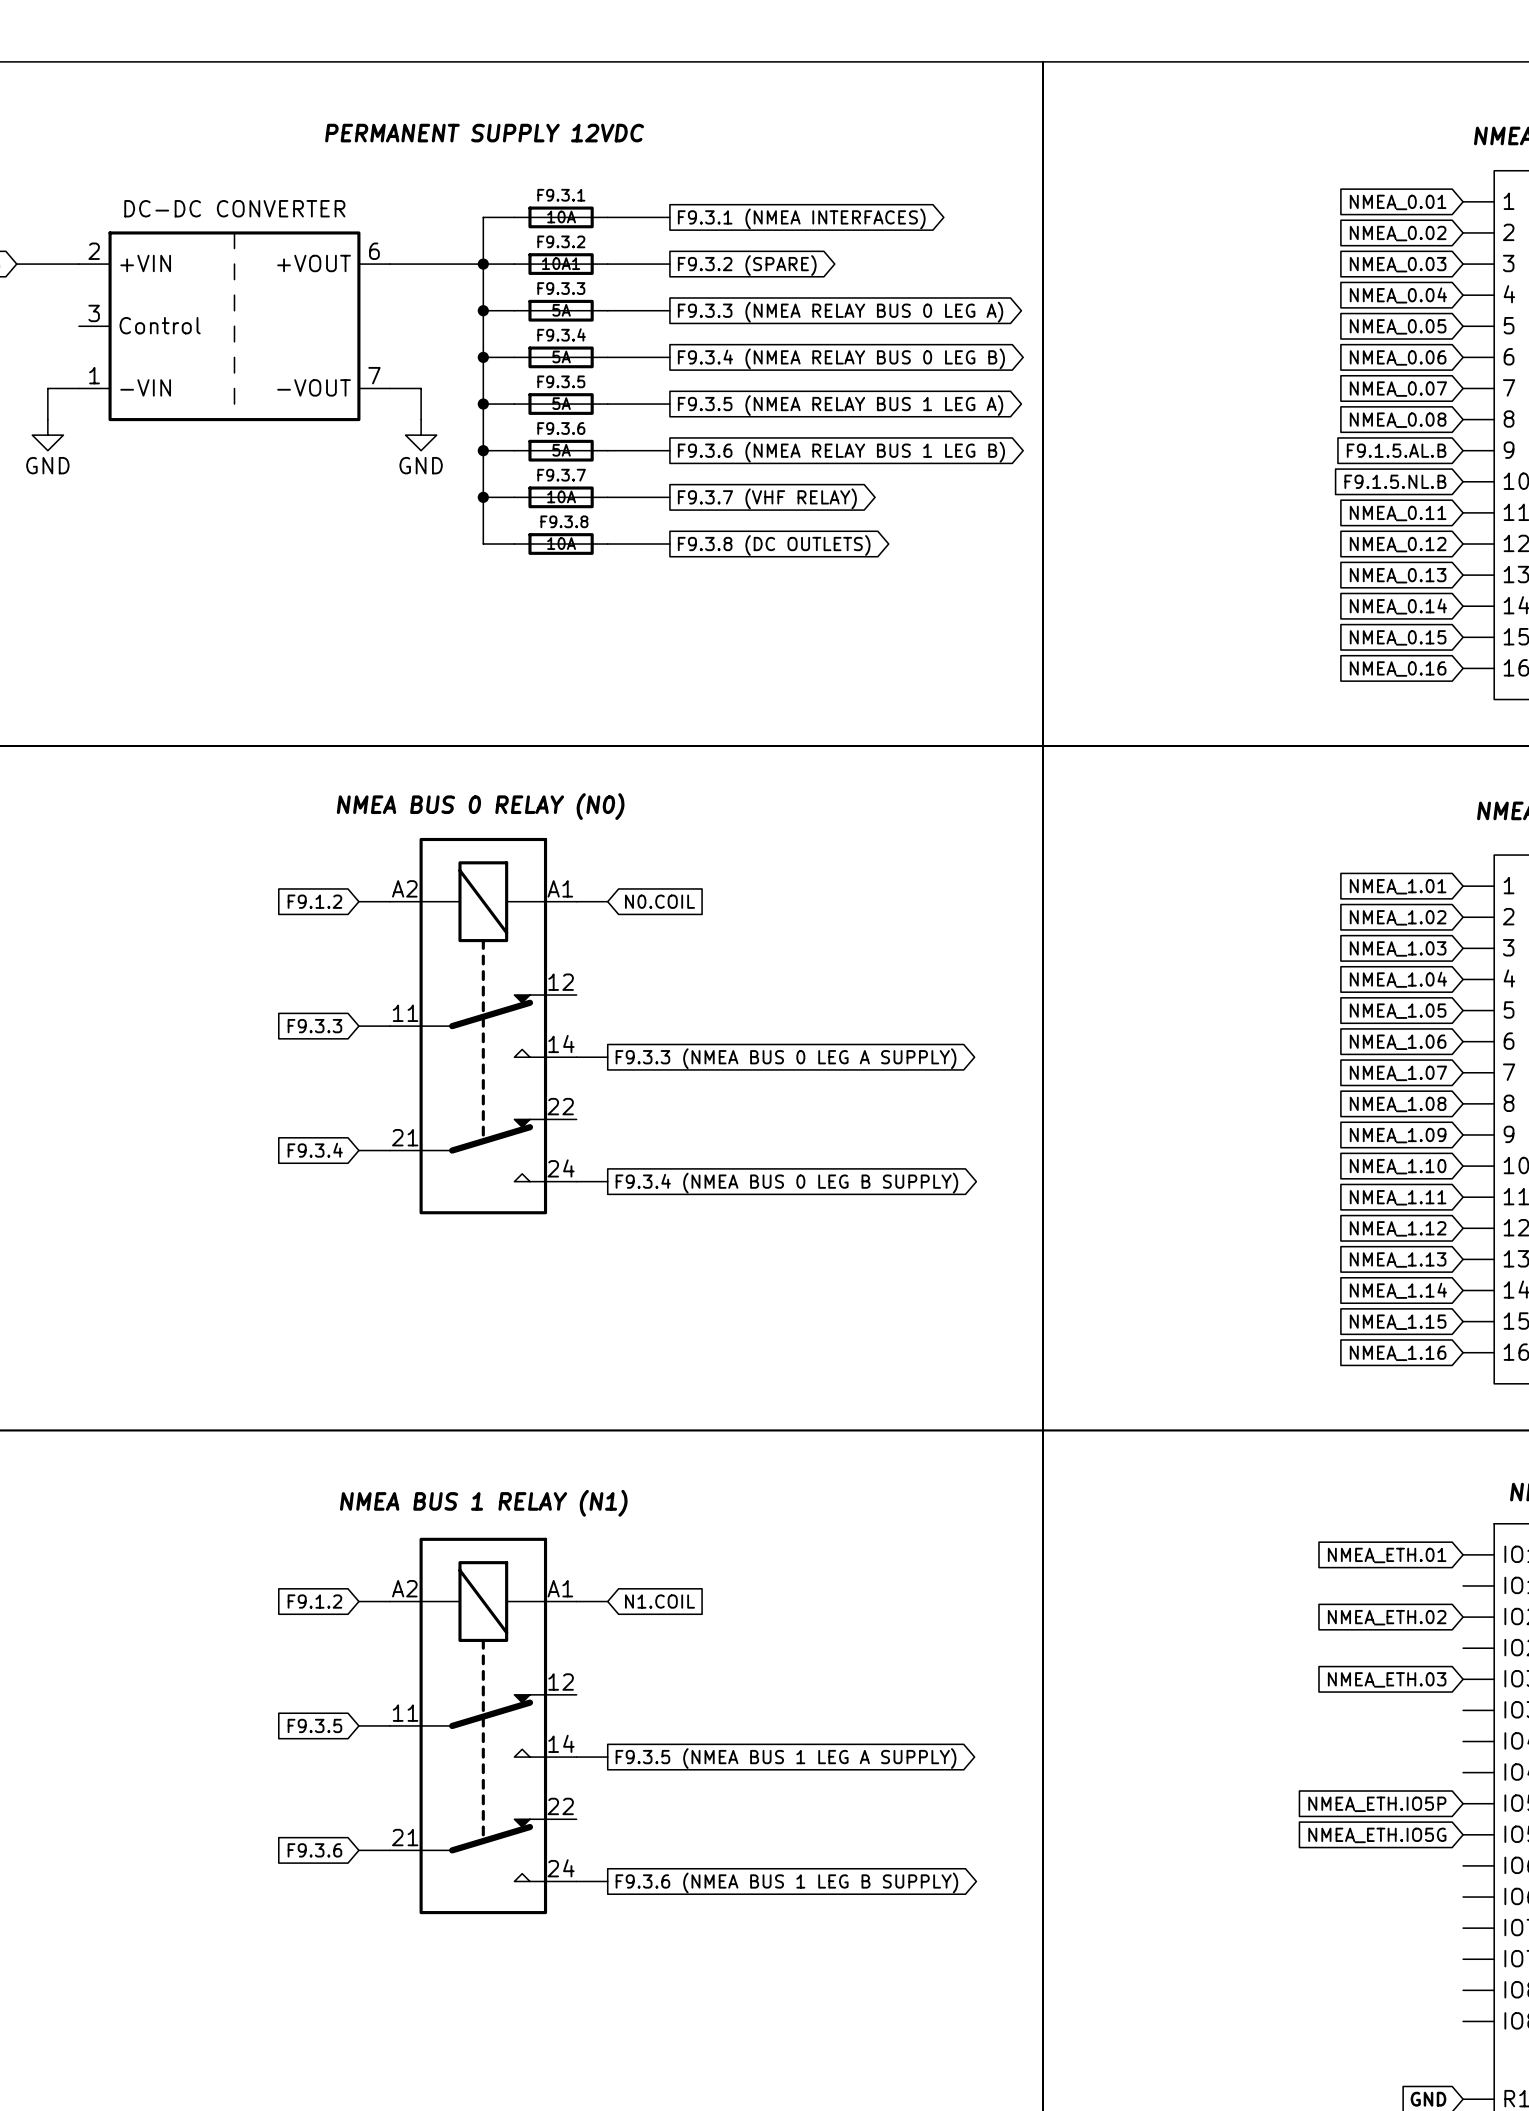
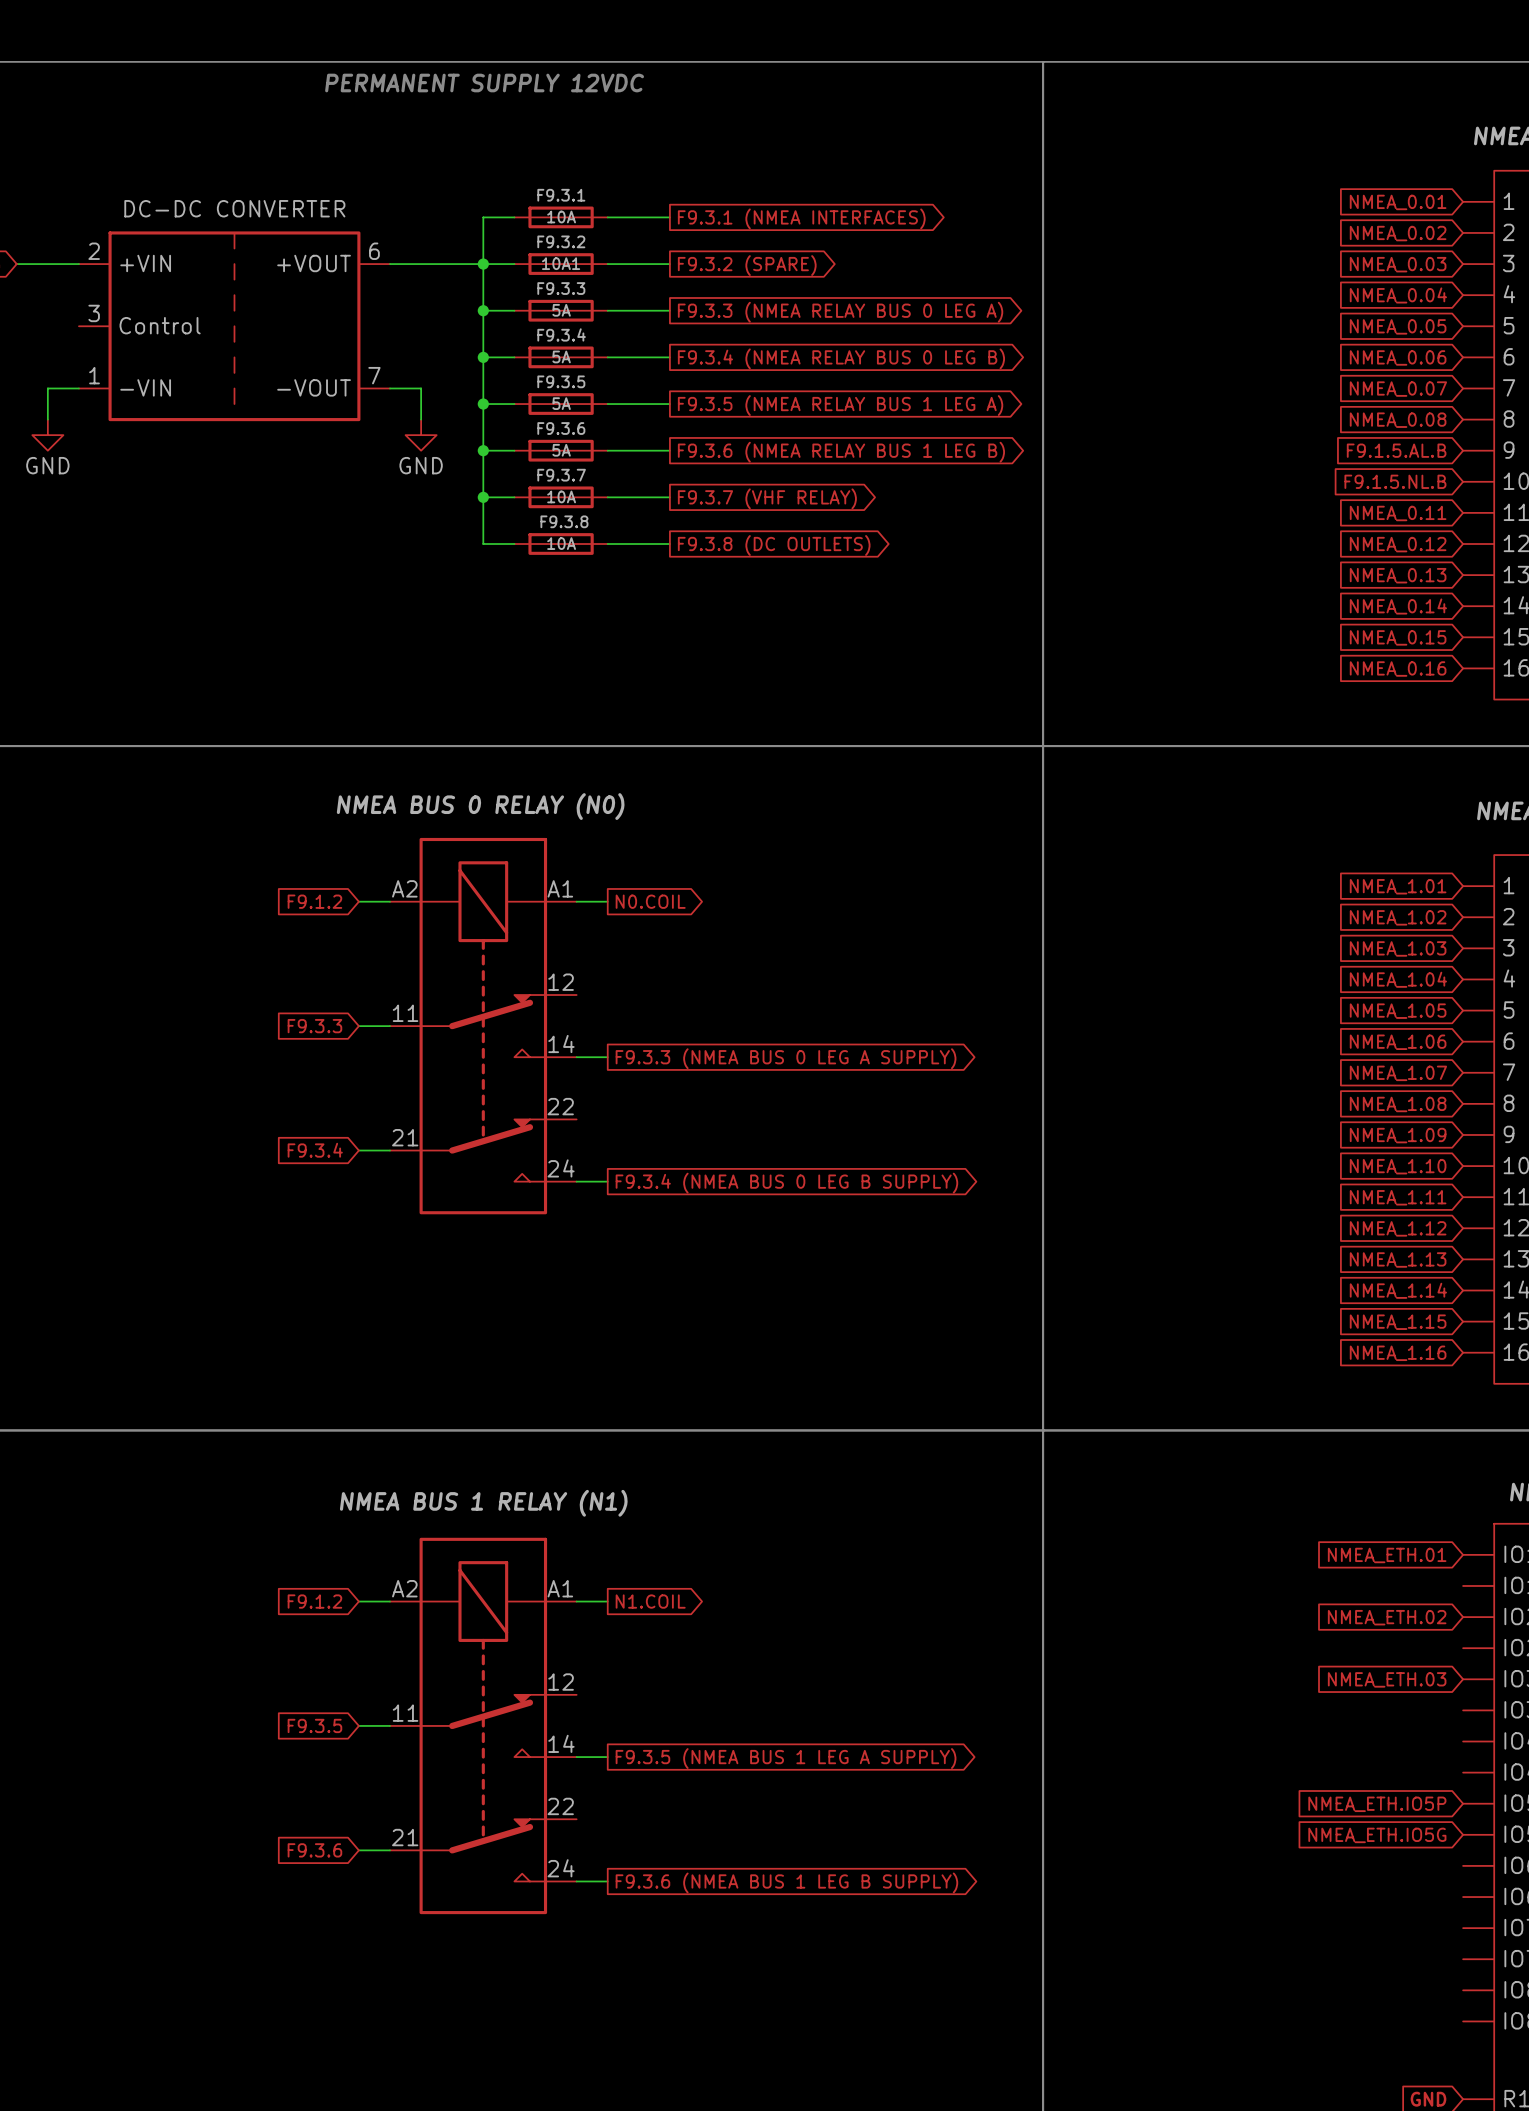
text position: PERMANENT SUPPLY 12VDC (484, 133) -> PERMANENT SUPPLY 12VDC (484, 83)
global label shape: input (659, 901) -> output (650, 901)
global label shape: input (659, 1601) -> output (650, 1601)

